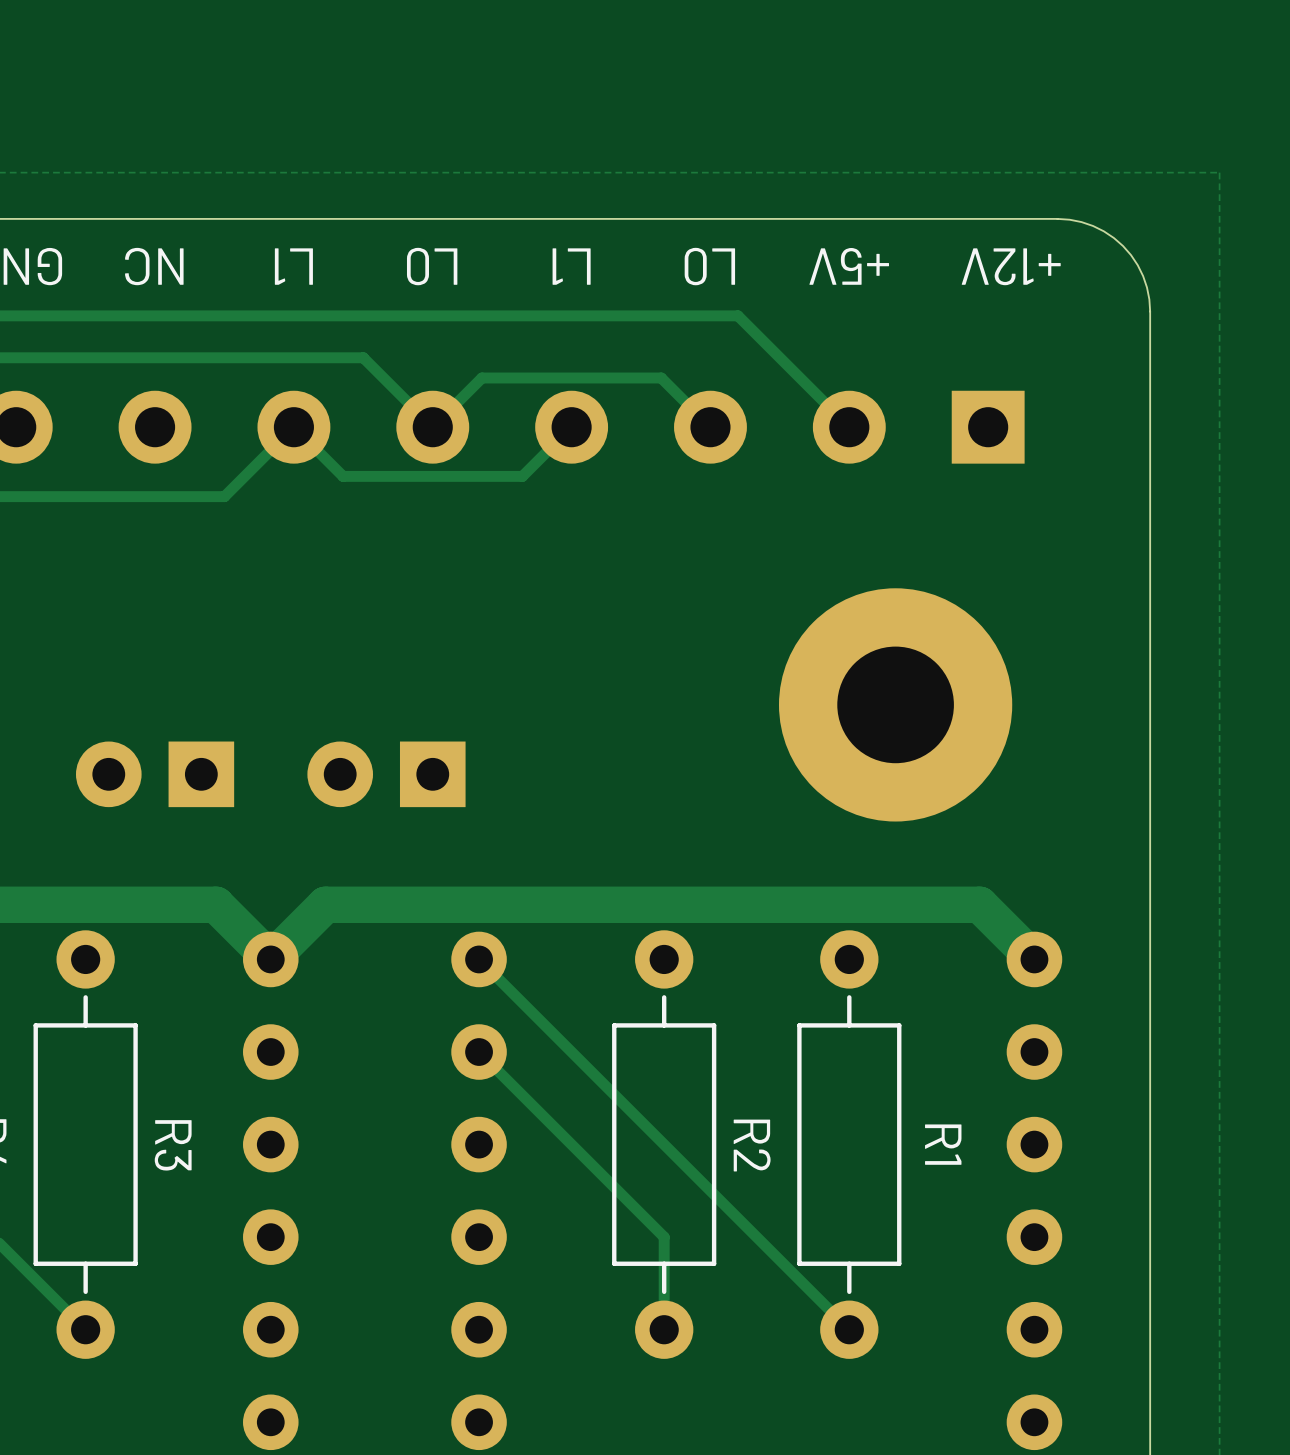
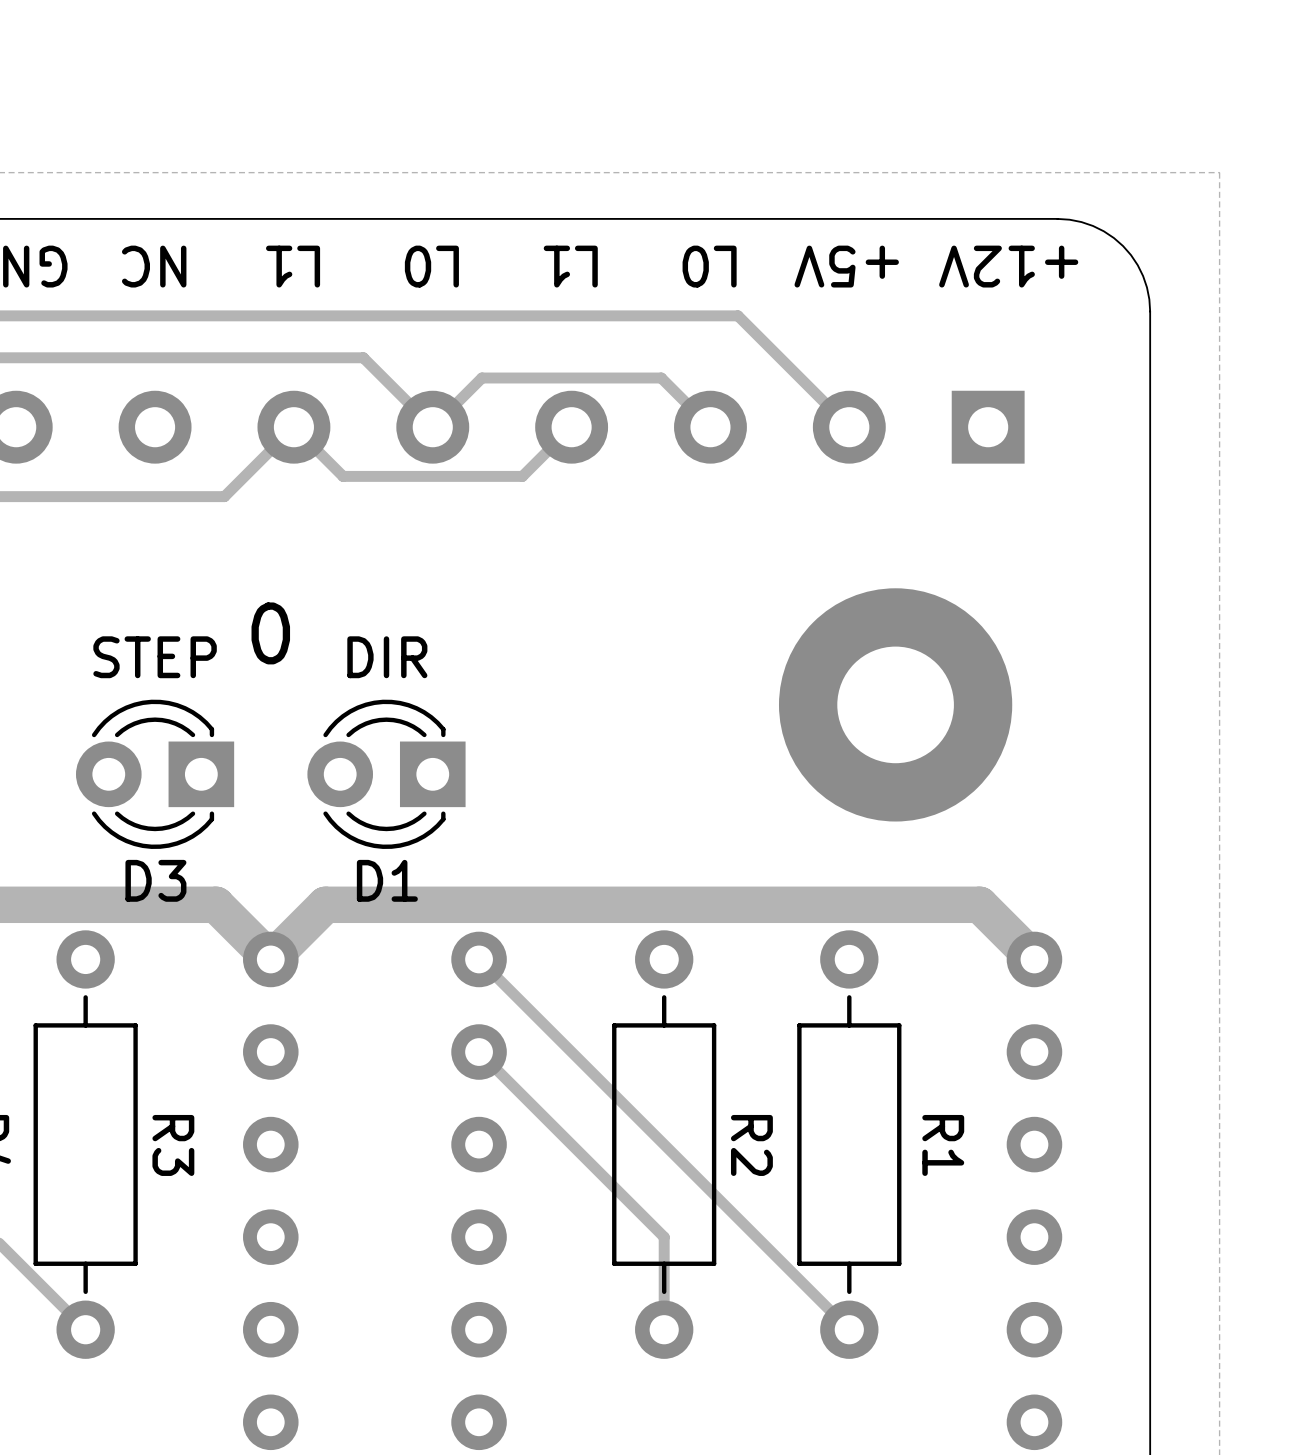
text: none -> 0 (270, 633)
text: none -> STEP (155, 657)
text: none -> DIR (387, 657)
D3 side: top (155, 774) -> bottom (155, 774)
D1 side: top (386, 774) -> bottom (386, 774)

